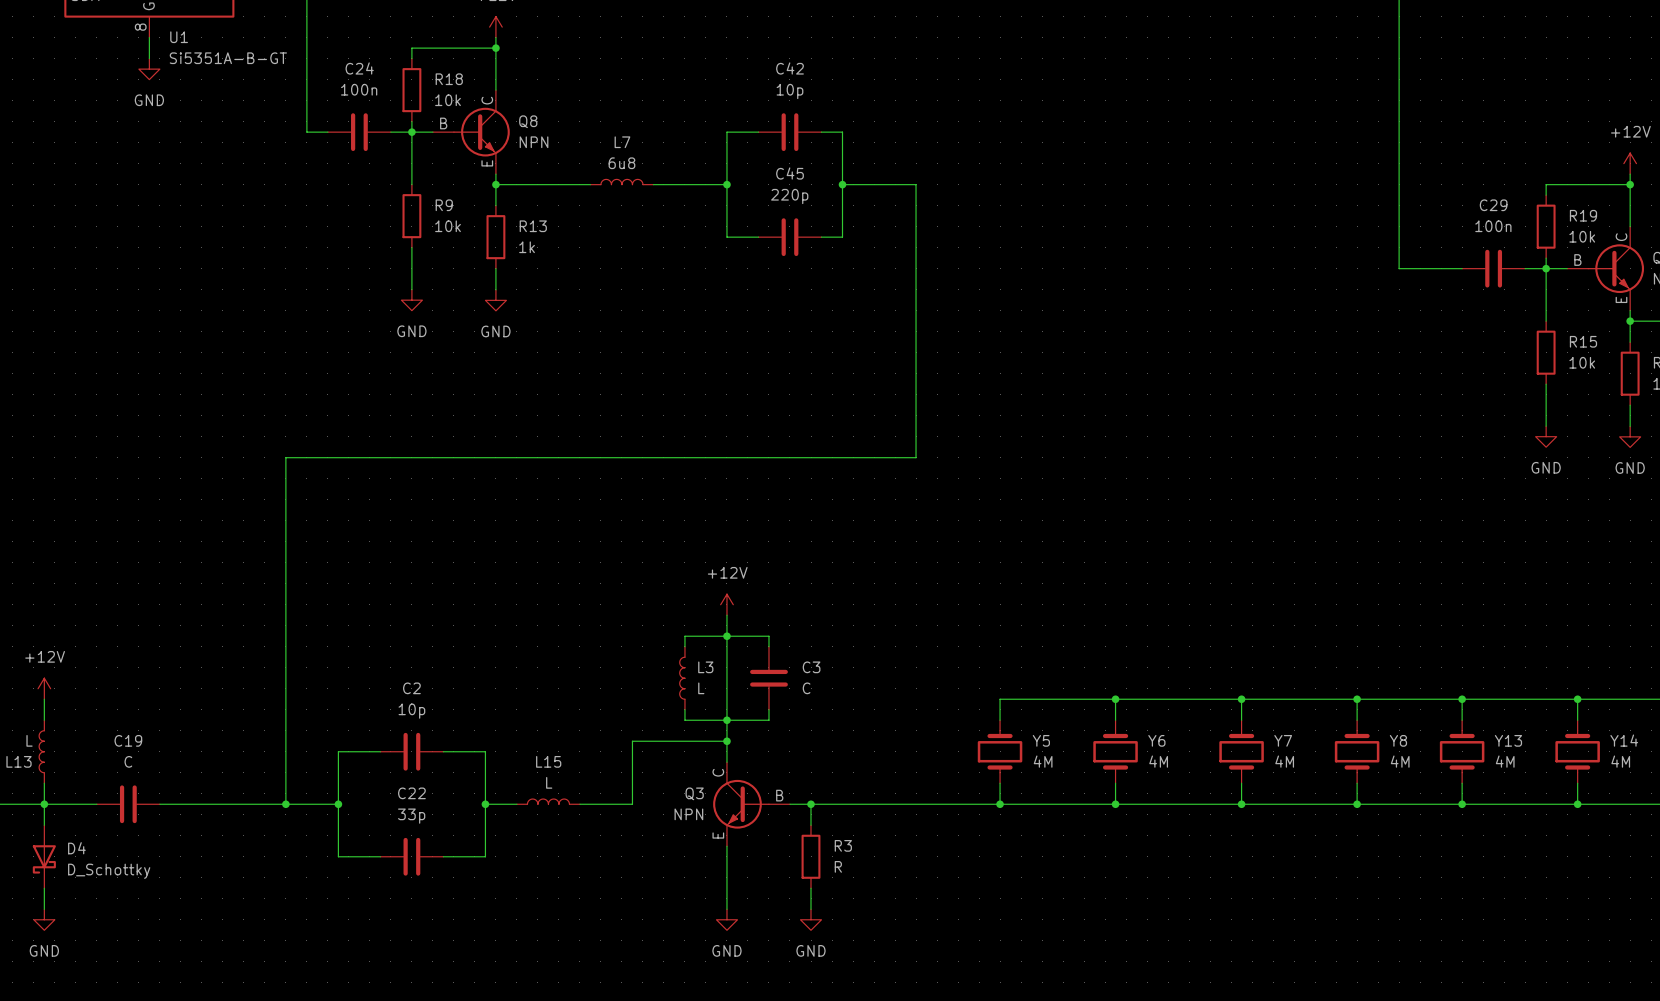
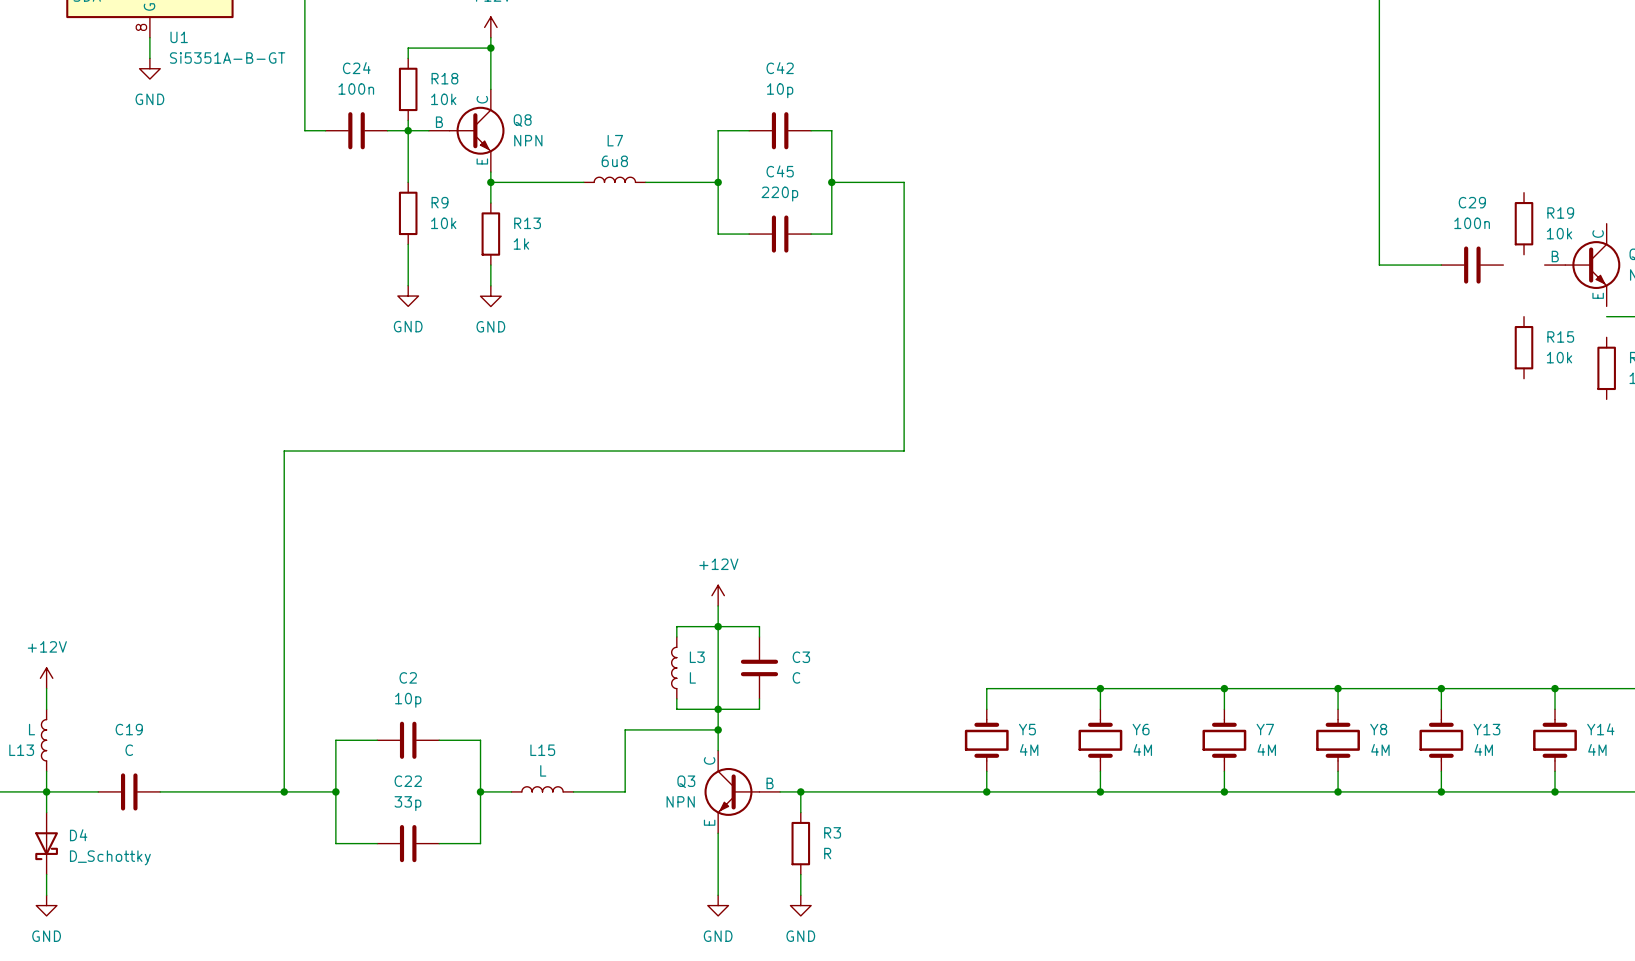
power symbol: +12V (1630, 163) -> none
wire: (1630, 174) (1630, 226) -> none
wire: (1630, 184) (1546, 184) (1546, 195) -> none
junction: (1630, 184) -> none
wire: (1546, 258) (1546, 321) -> none
wire: (1525, 268) (1567, 268) -> none
junction: (1546, 268) -> none
wire: (1630, 310) (1630, 342) -> none
junction: (1630, 321) -> none
wire: (1546, 384) (1546, 426) -> none
wire: (1630, 405) (1630, 426) -> none
power symbol: GND (1546, 436) -> none
power symbol: GND (1630, 436) -> none

